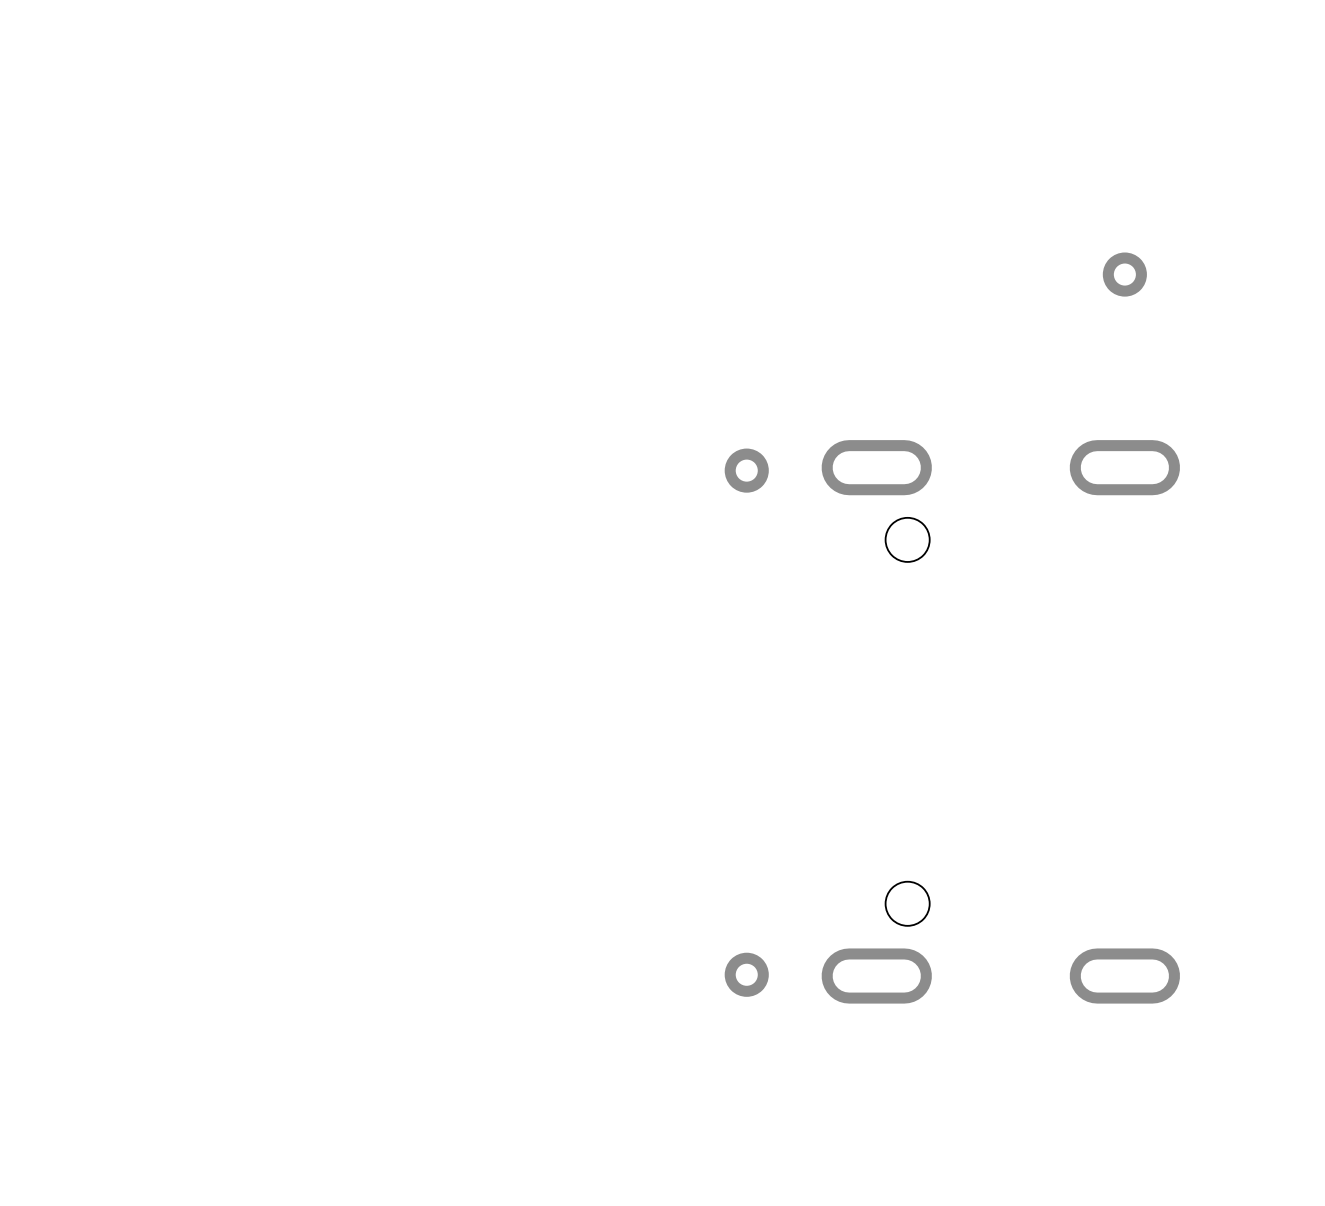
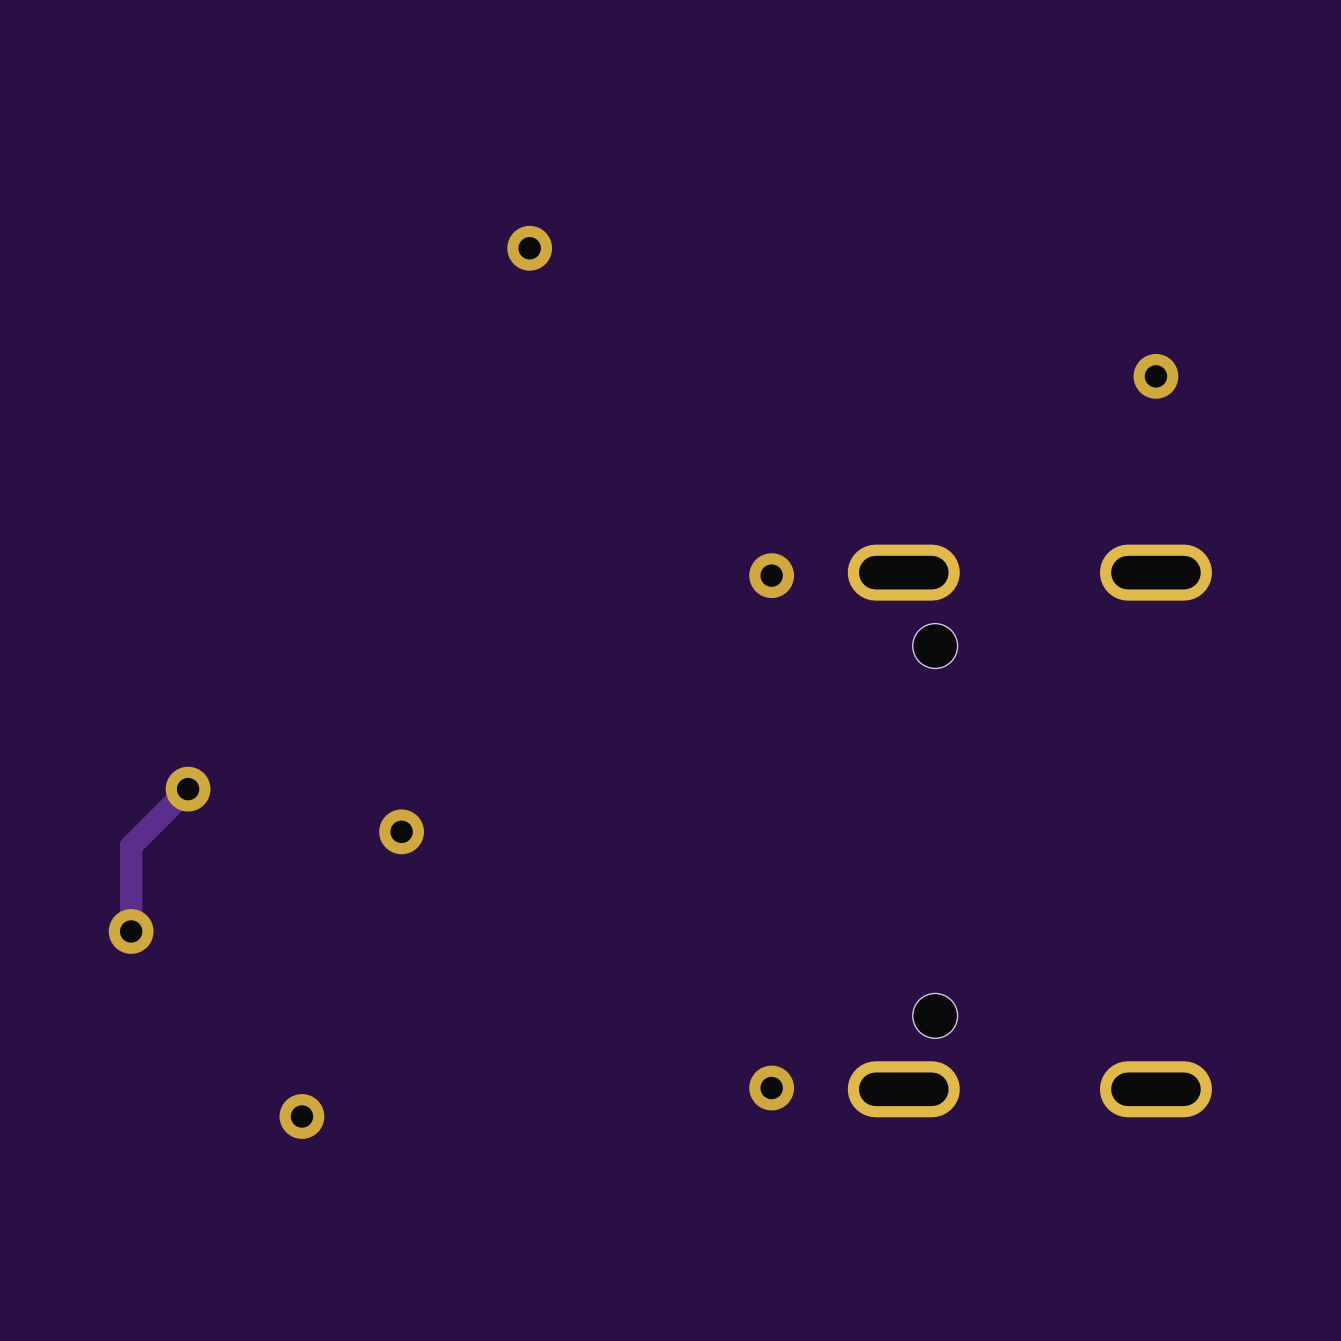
via: none -> (529, 248)
track: none -> (188, 789) (131, 846) (131, 931)
via: none -> (188, 789)
via: none -> (401, 831)
via: none -> (131, 931)
via: none -> (301, 1116)

